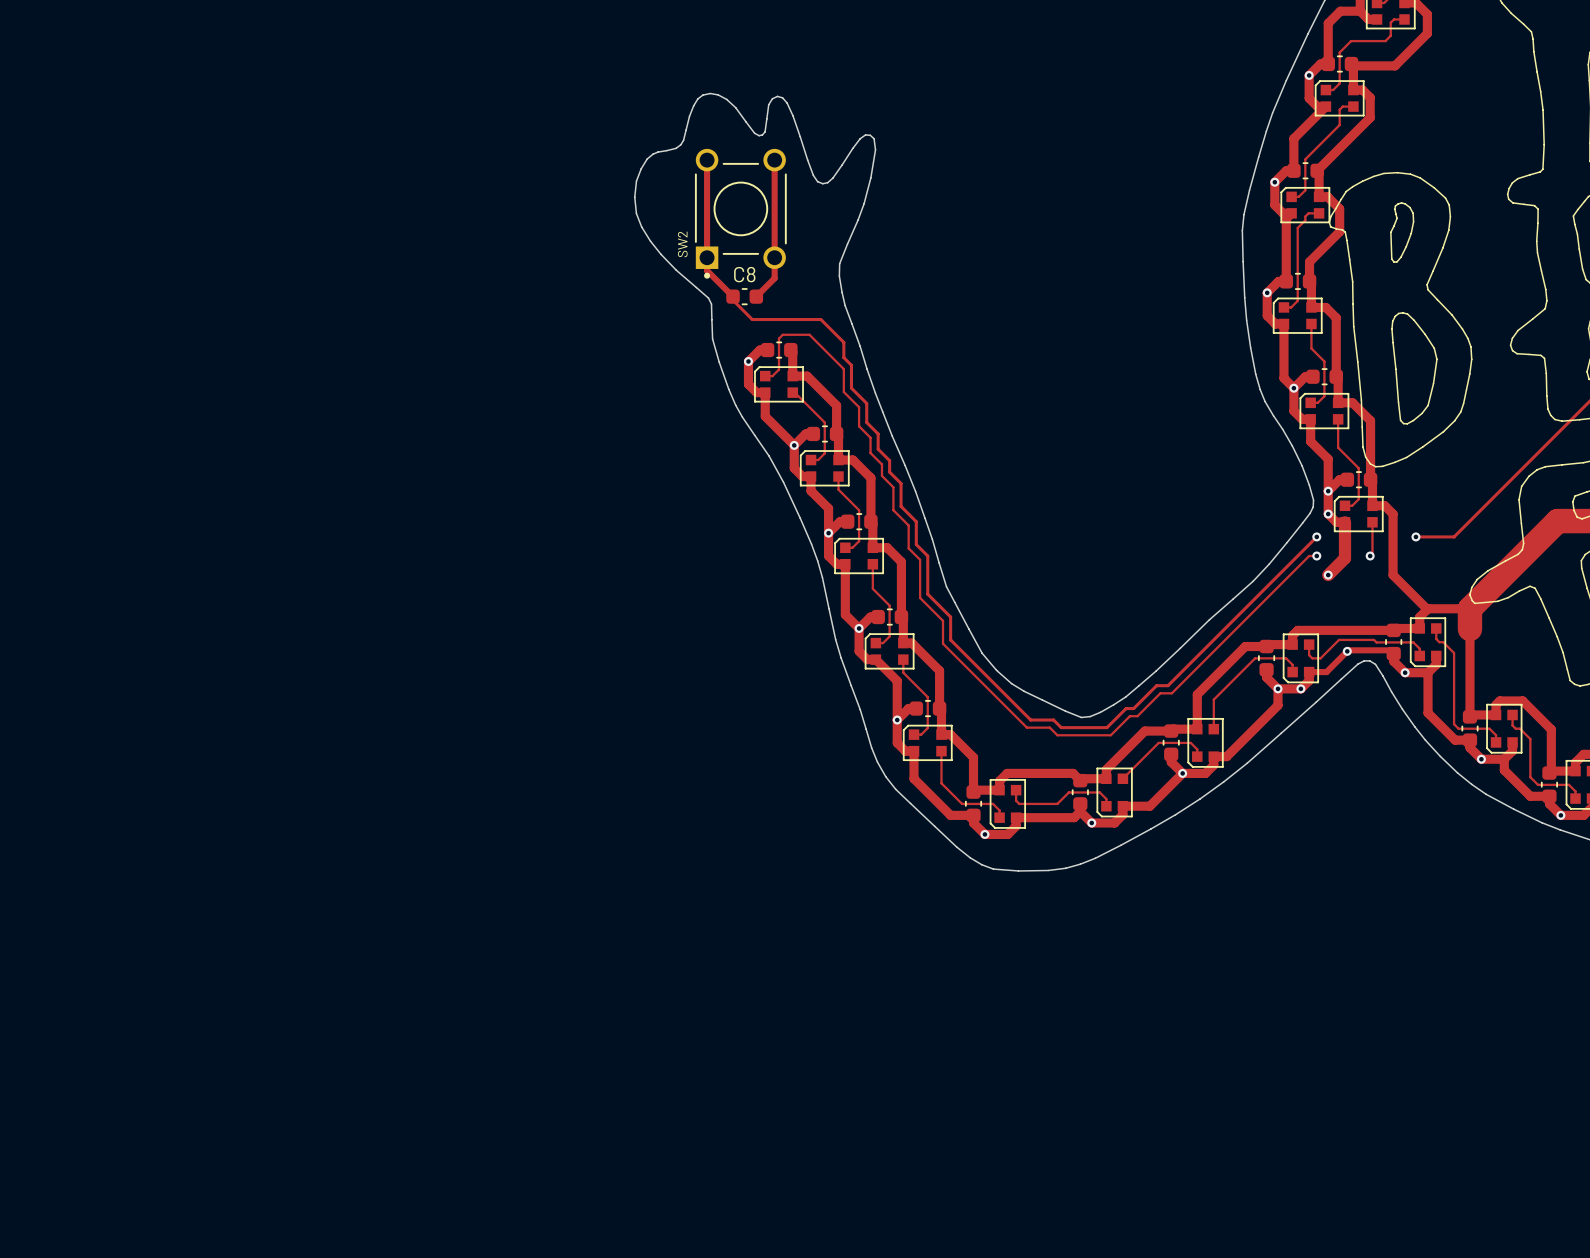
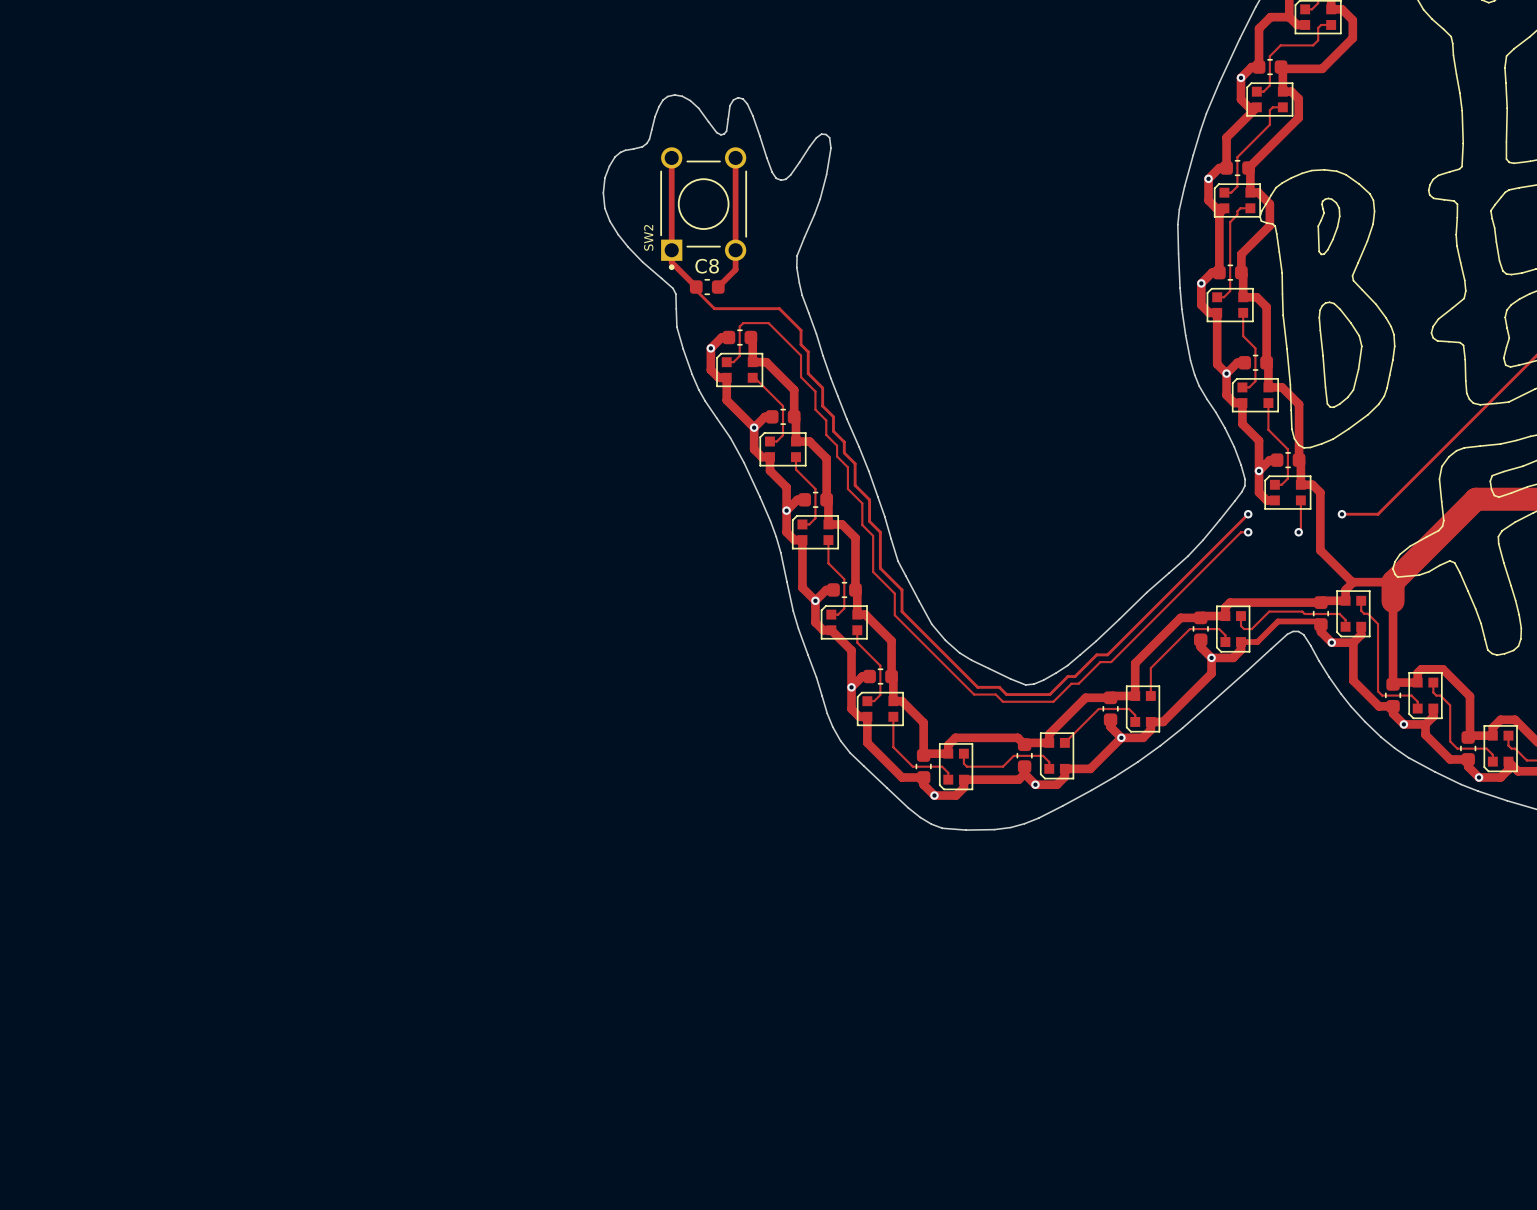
via: (1328, 514) -> none
track: (1345, 522) (1345, 558) (1328, 575) -> none
via: (1328, 575) -> none
via: (1347, 651) -> none
via: (1300, 688) -> none

